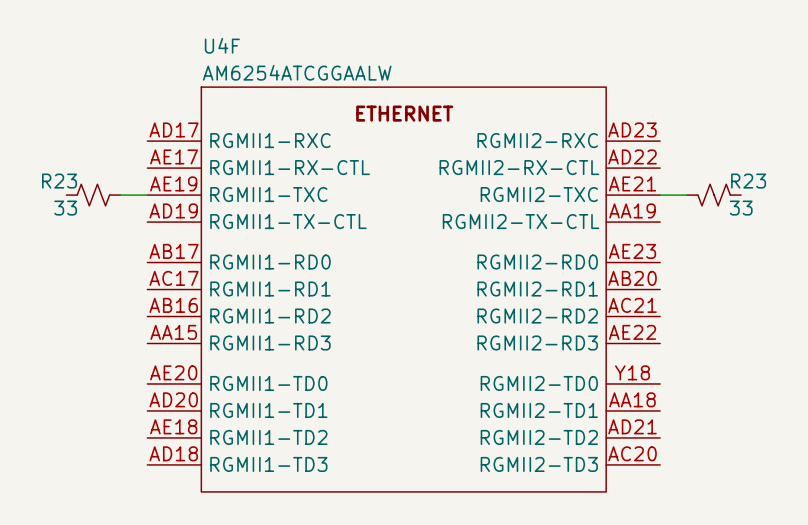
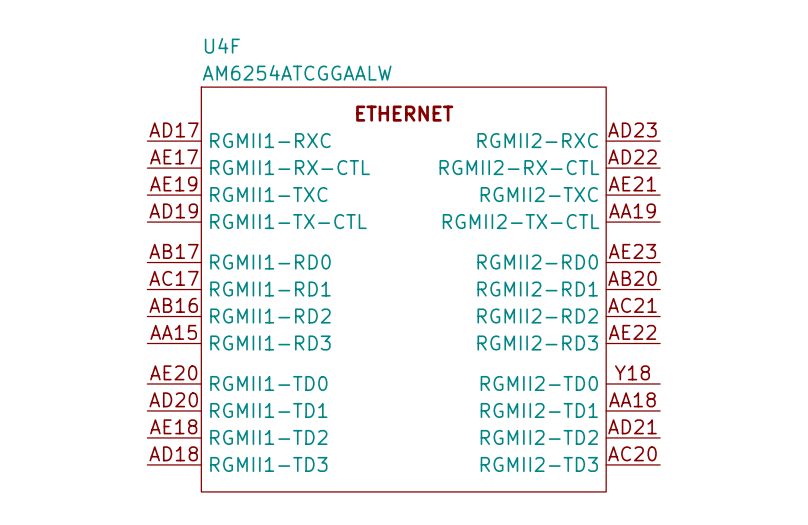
R23: 33 (93, 195) -> none
wire: (120, 195) (147, 195) -> none
wire: (660, 195) (687, 195) -> none
R23: 33 (714, 195) -> none

